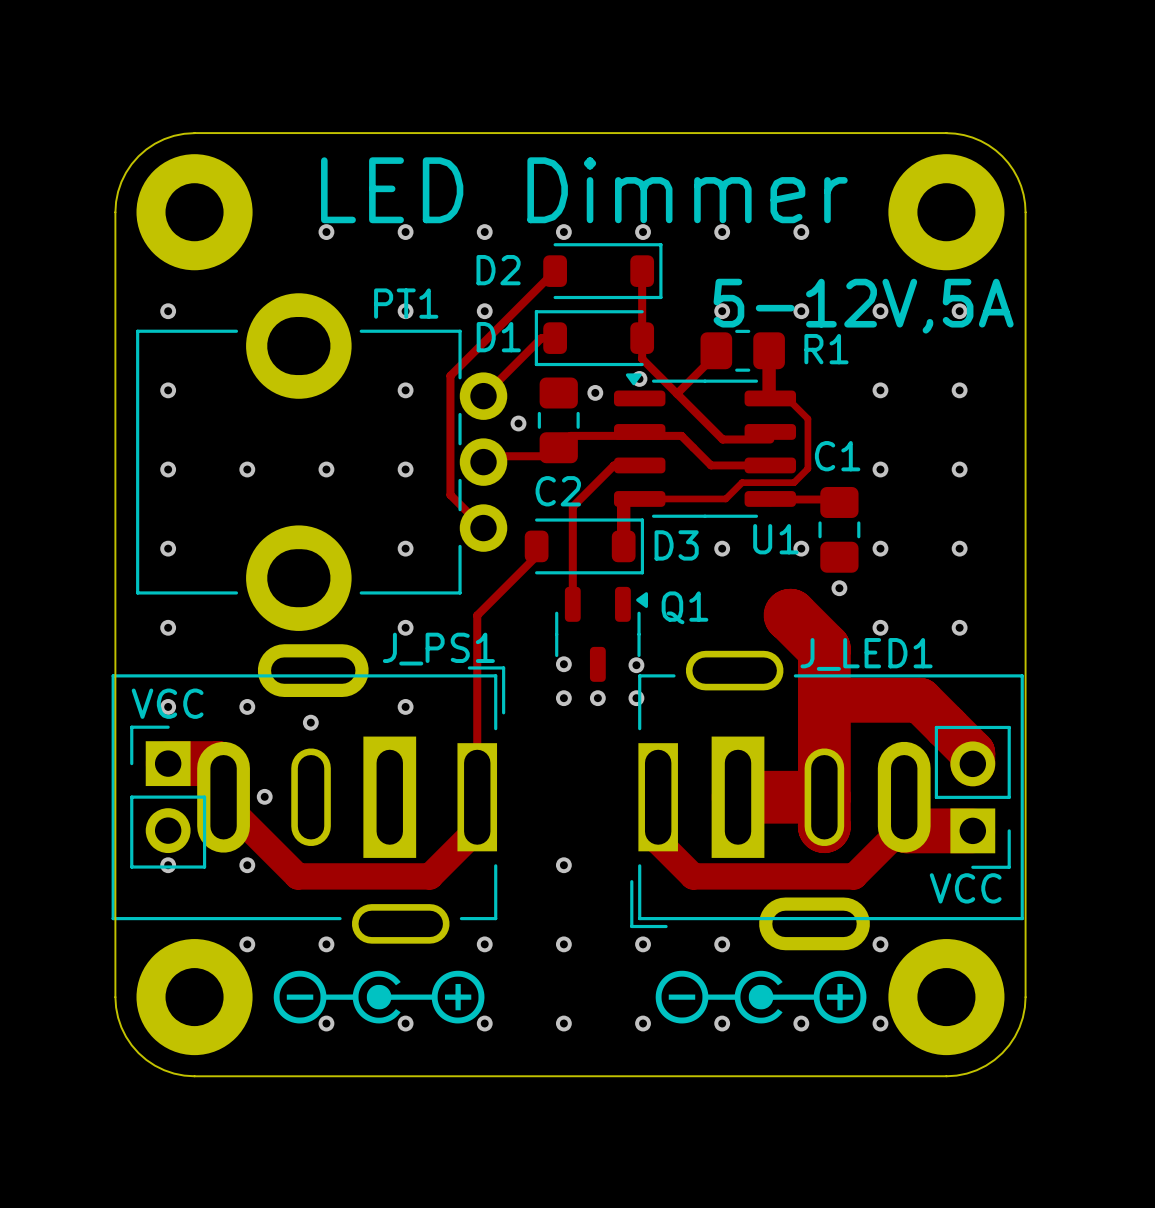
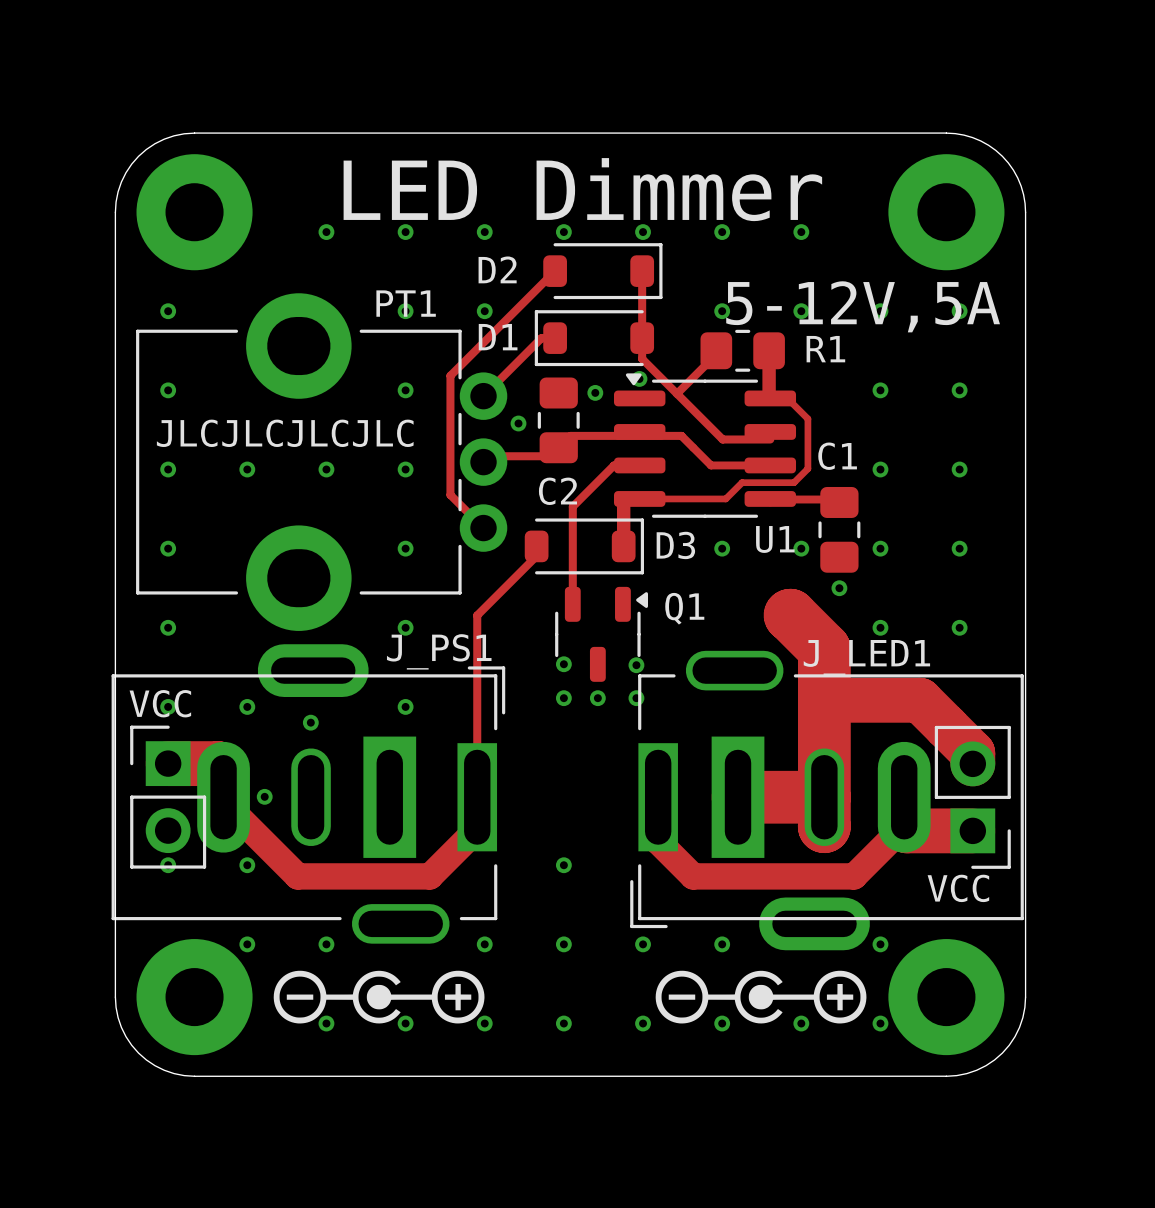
text: none -> JLCJLCJLCJLC (285, 433)

